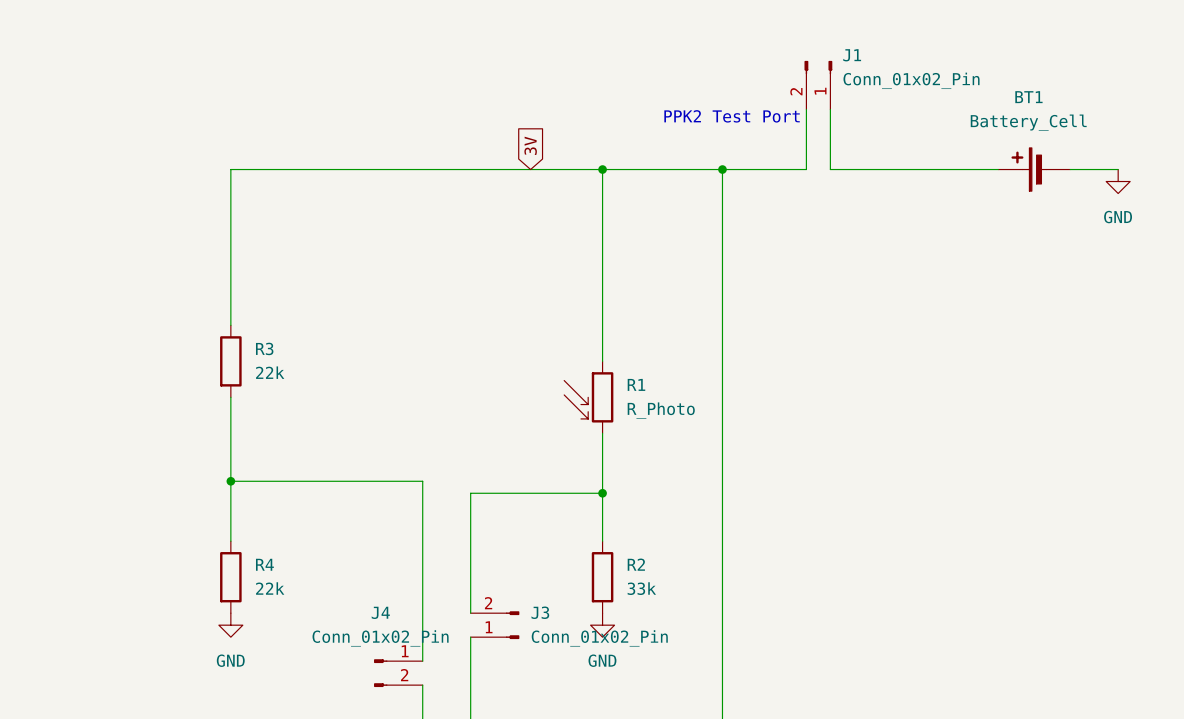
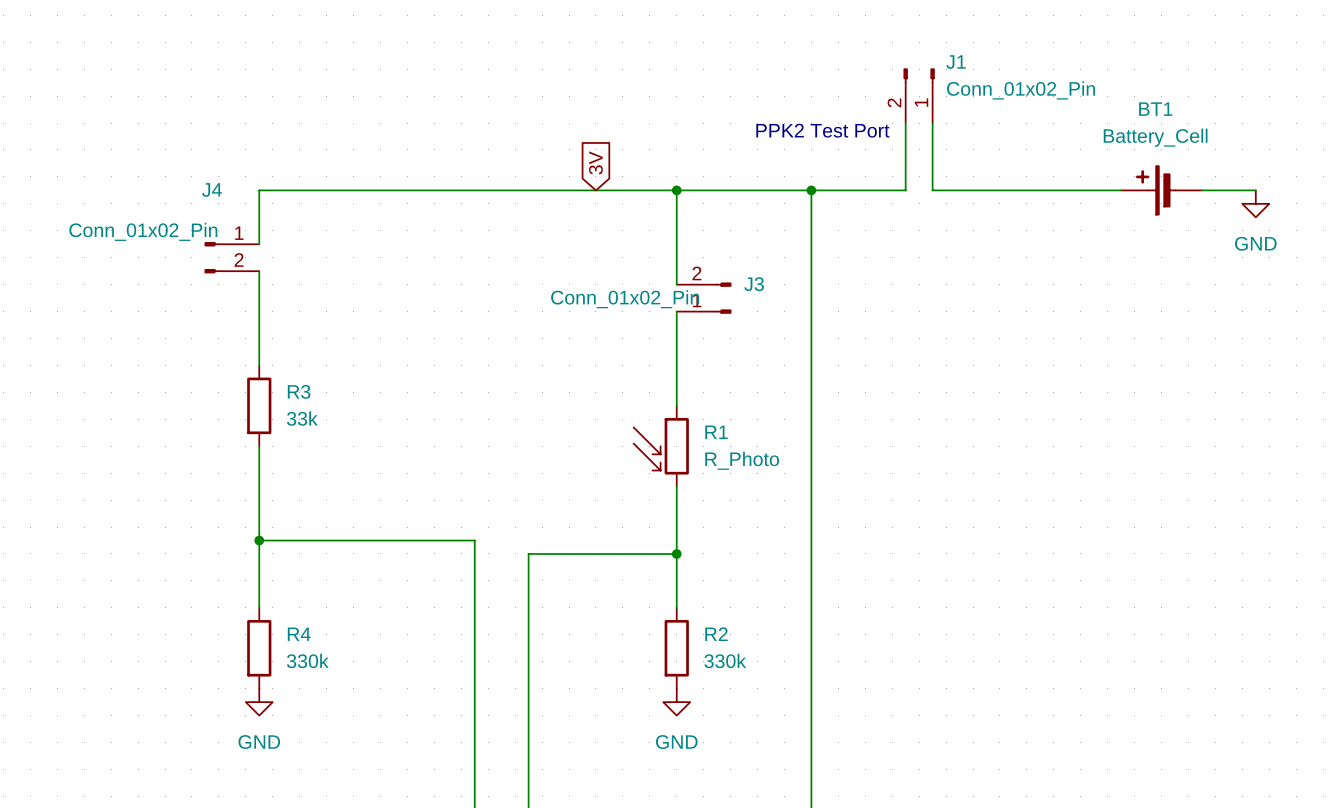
wire: (230, 217) (230, 241) -> none
wire: (602, 253) (602, 277) -> none
R3 value: 22k (270, 372) -> 33k (302, 418)
R4 value: 22k (270, 588) -> 330k (307, 660)
R2 value: 33k (641, 588) -> 330k (725, 660)
wire: none -> (528, 688) (528, 715)
J3 position: (495, 625) -> (704, 298)
J4 value position: Conn_01x02_Pin (380, 638) -> Conn_01x02_Pin (143, 231)
J3 value position: Conn_01x02_Pin (599, 638) -> Conn_01x02_Pin (625, 299)
wire: none -> (474, 742) (474, 769)
J4 position: (398, 673) -> (231, 257)

